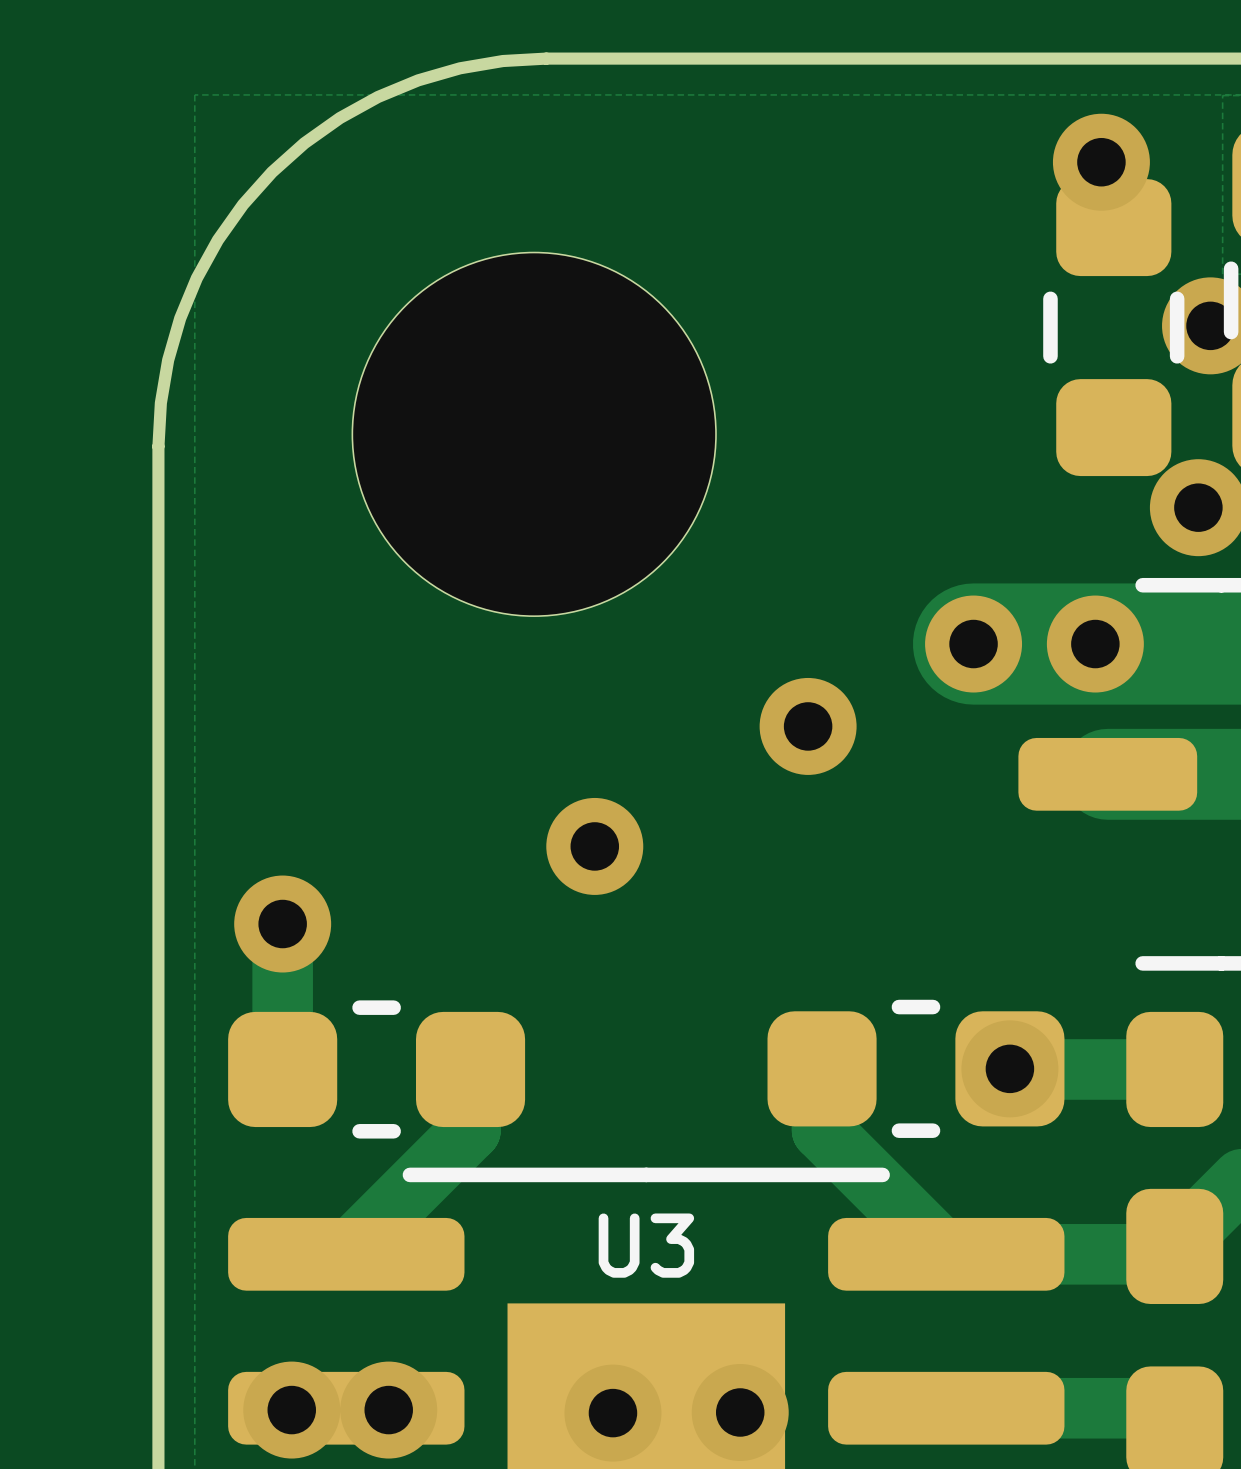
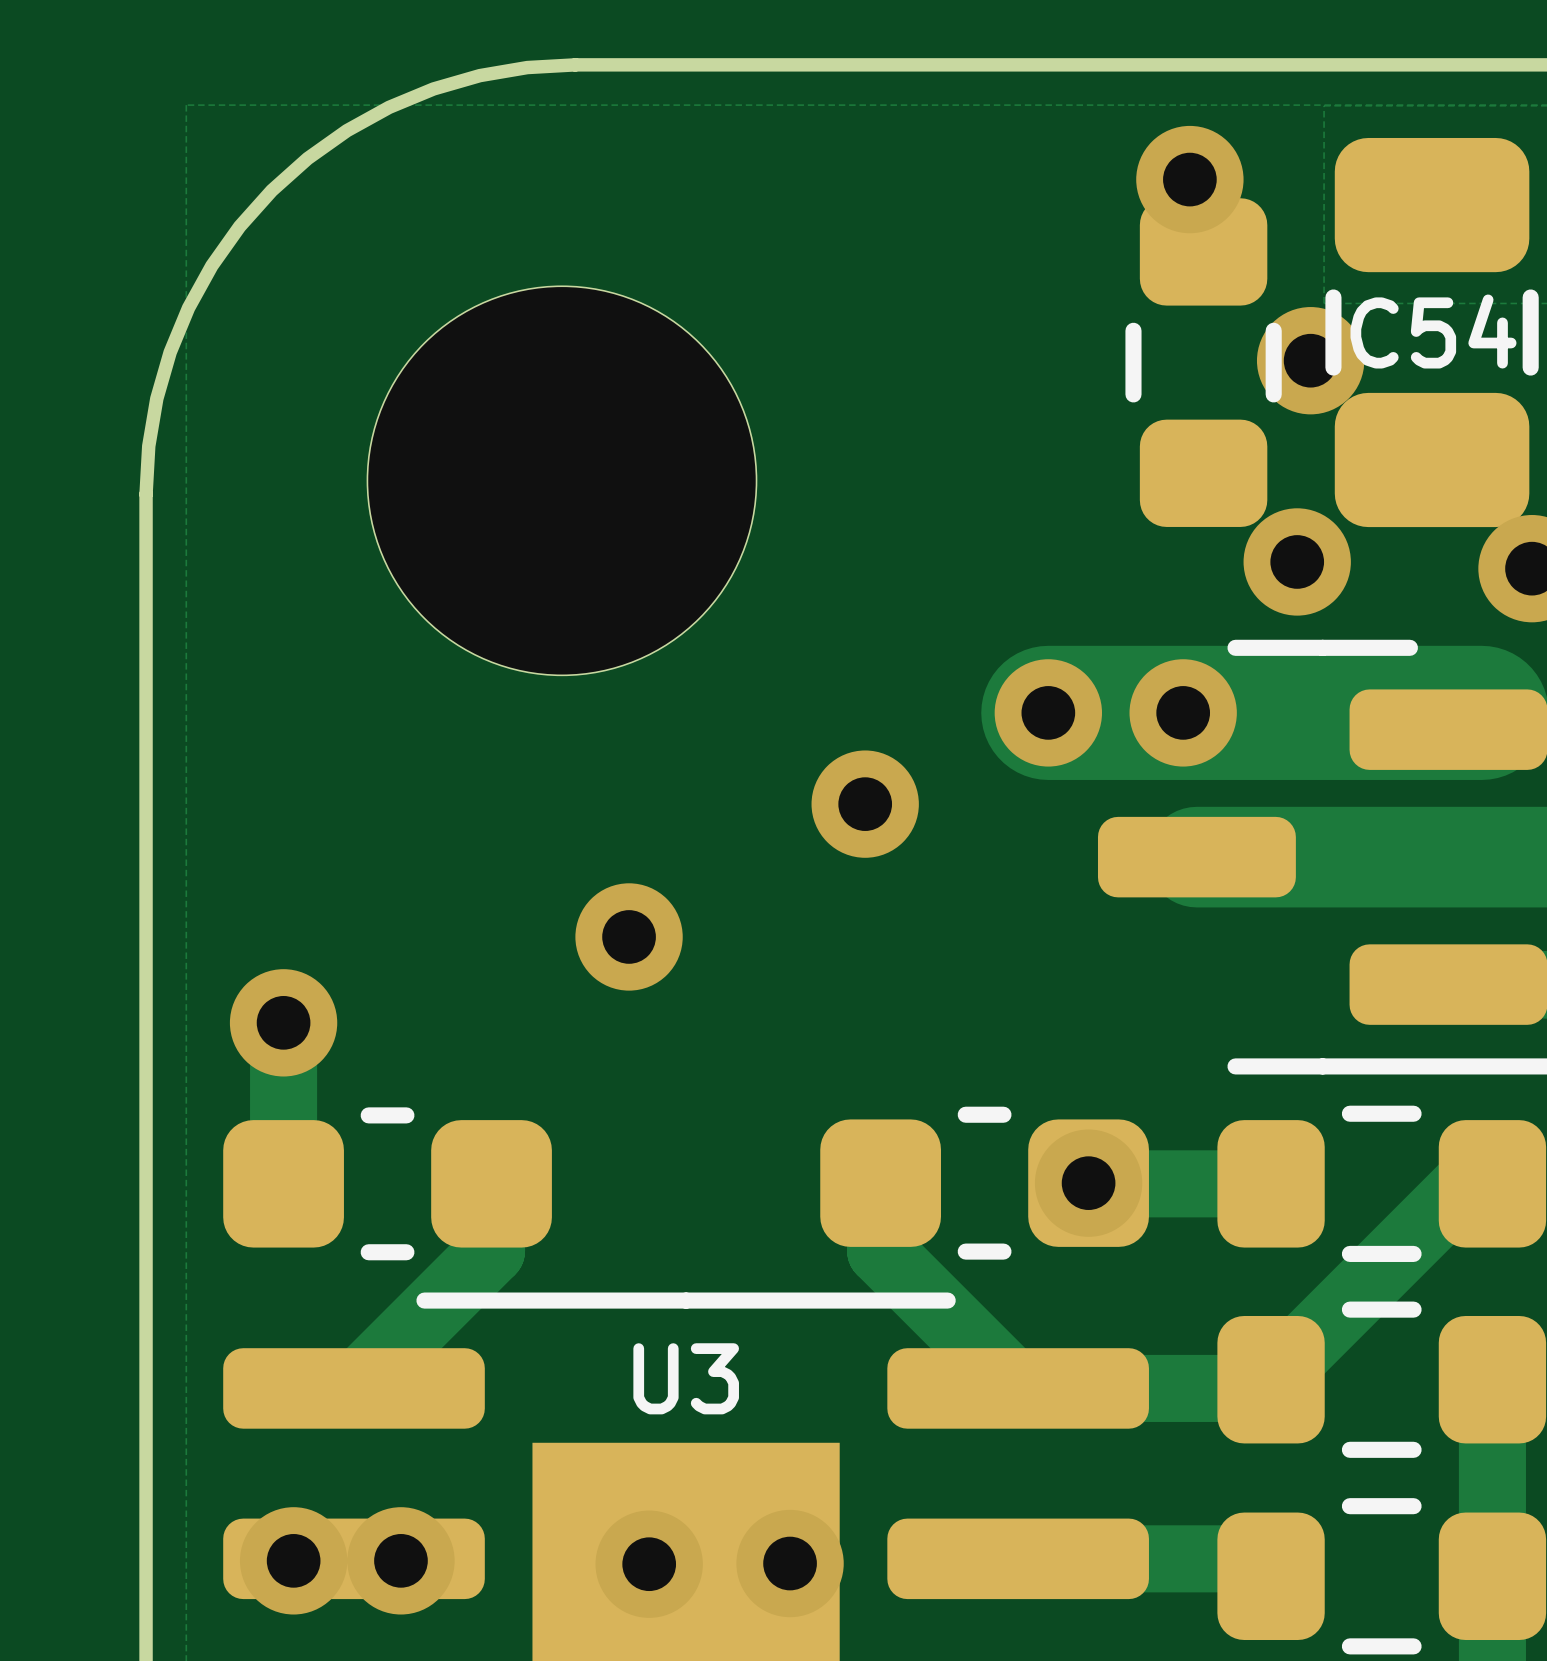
part footprint: [352, 252, 716, 617] -> [367, 286, 757, 676]

